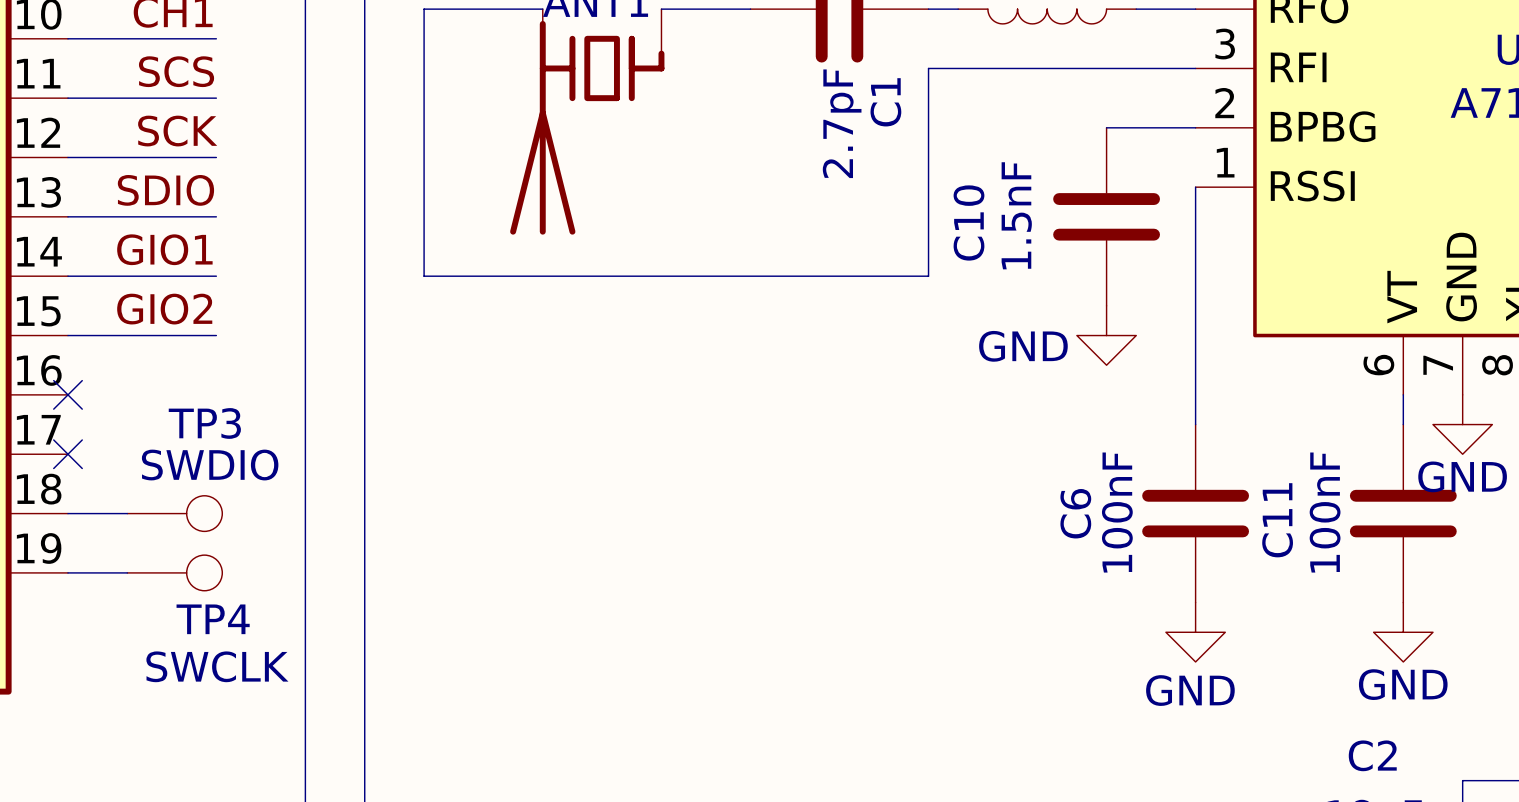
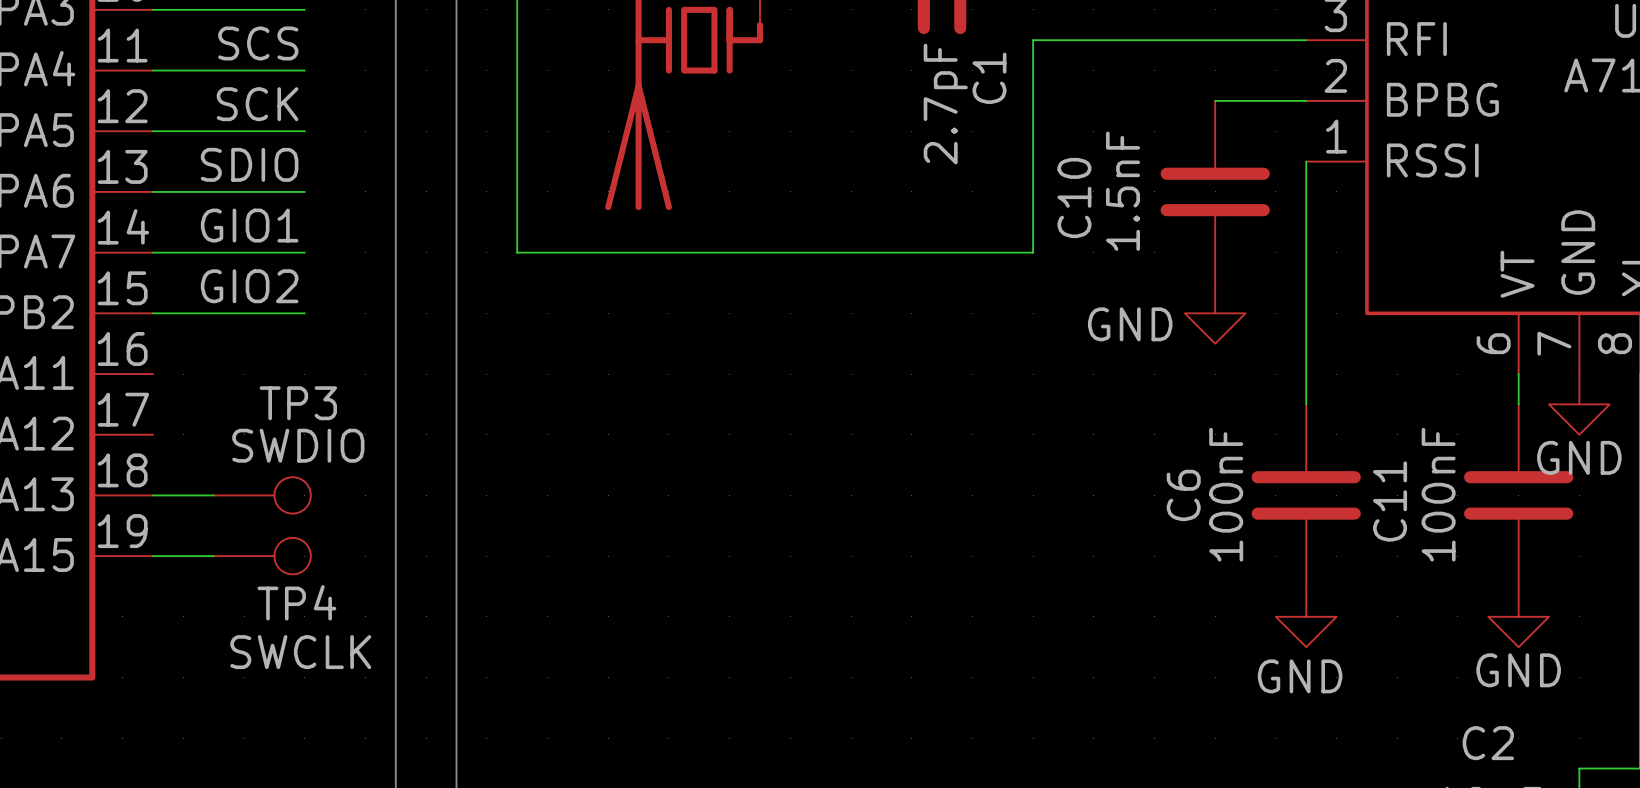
no-connect mark: (67, 394) -> none
no-connect mark: (67, 454) -> none

